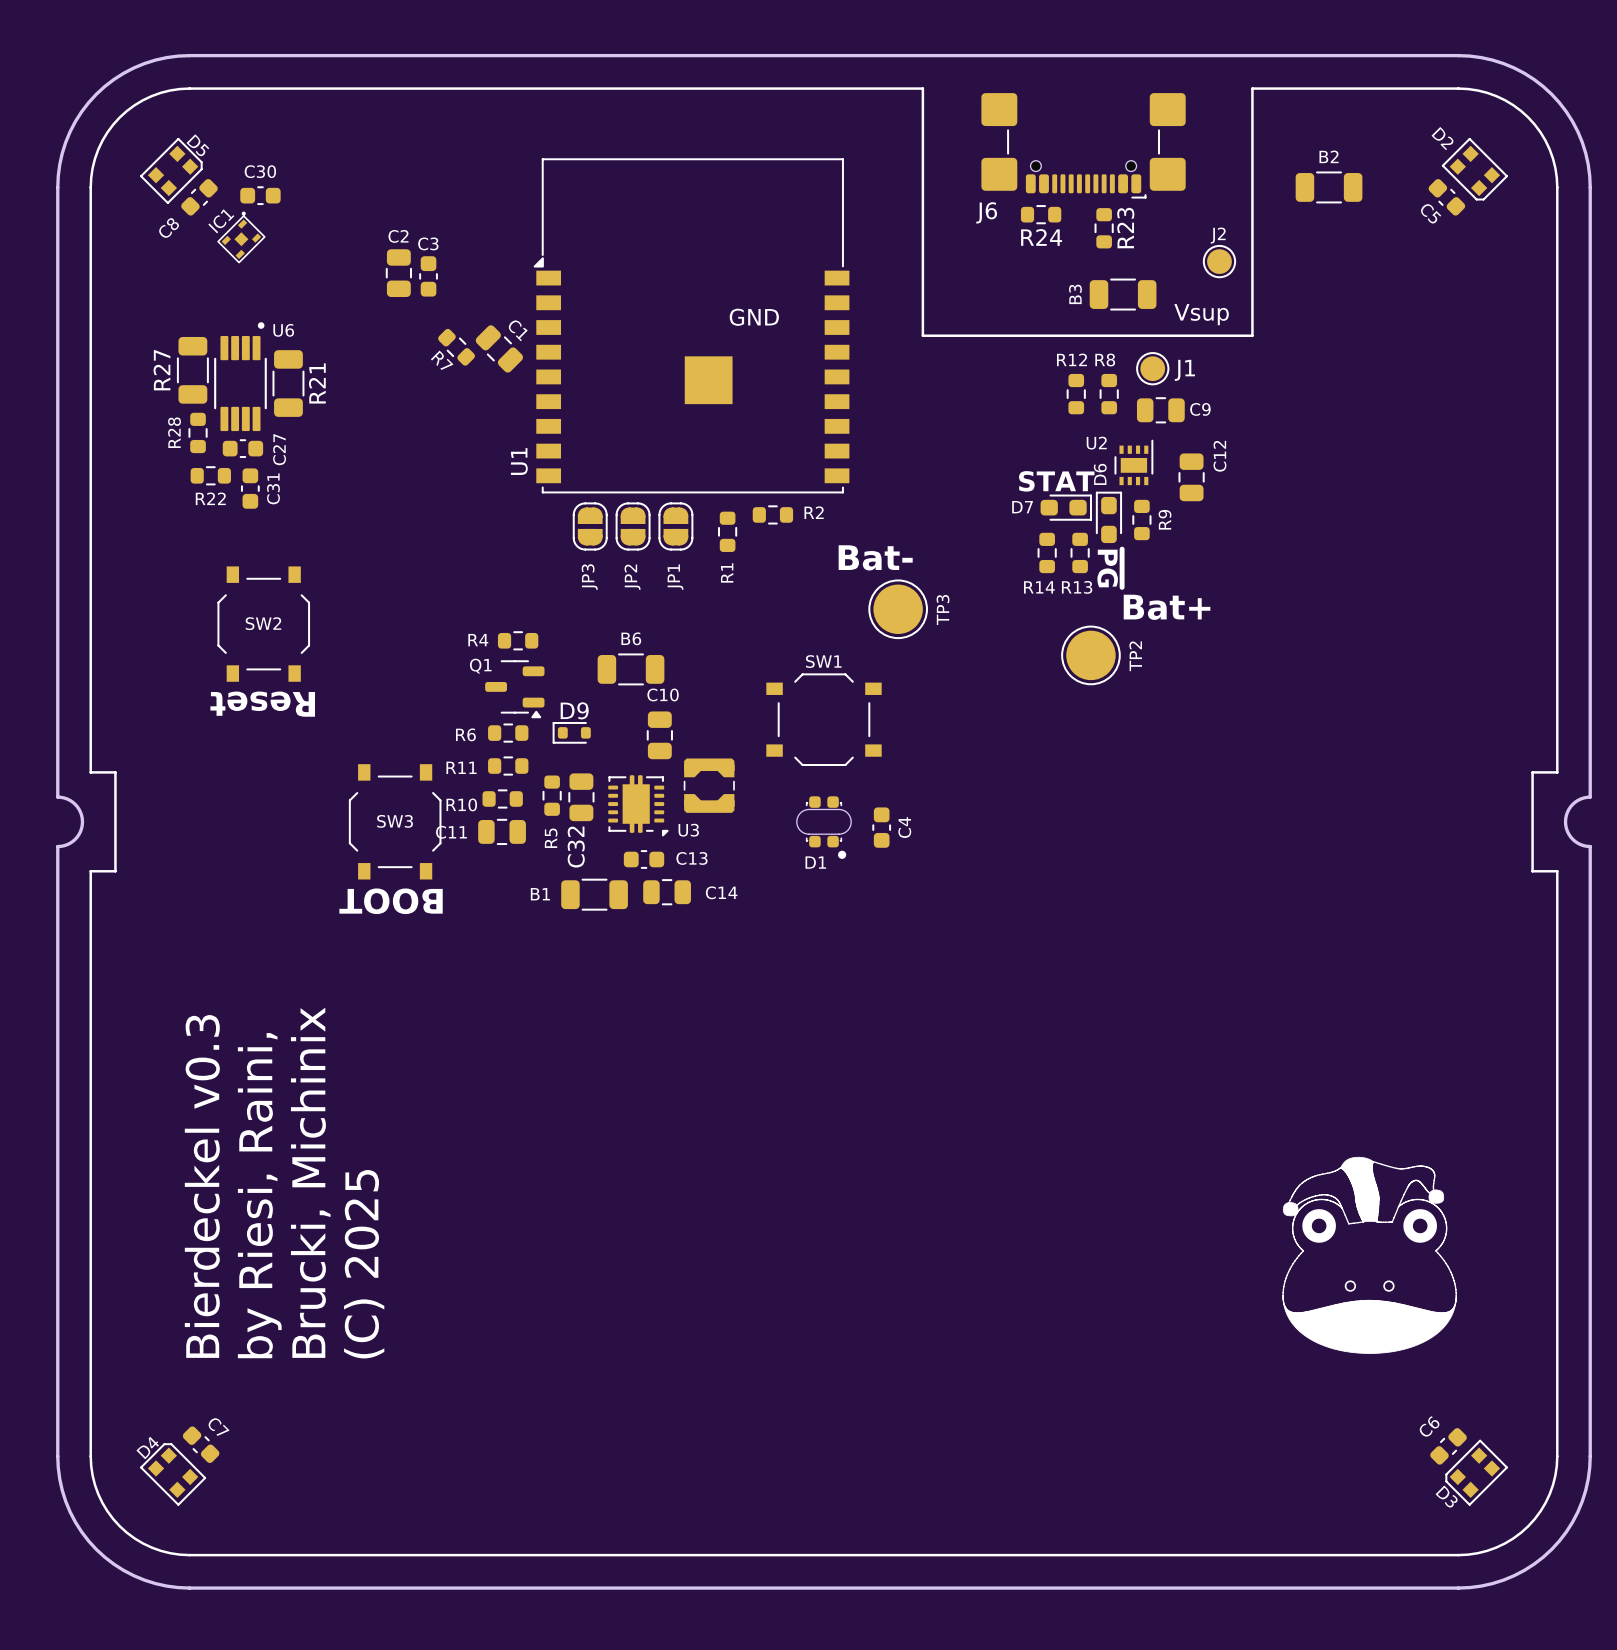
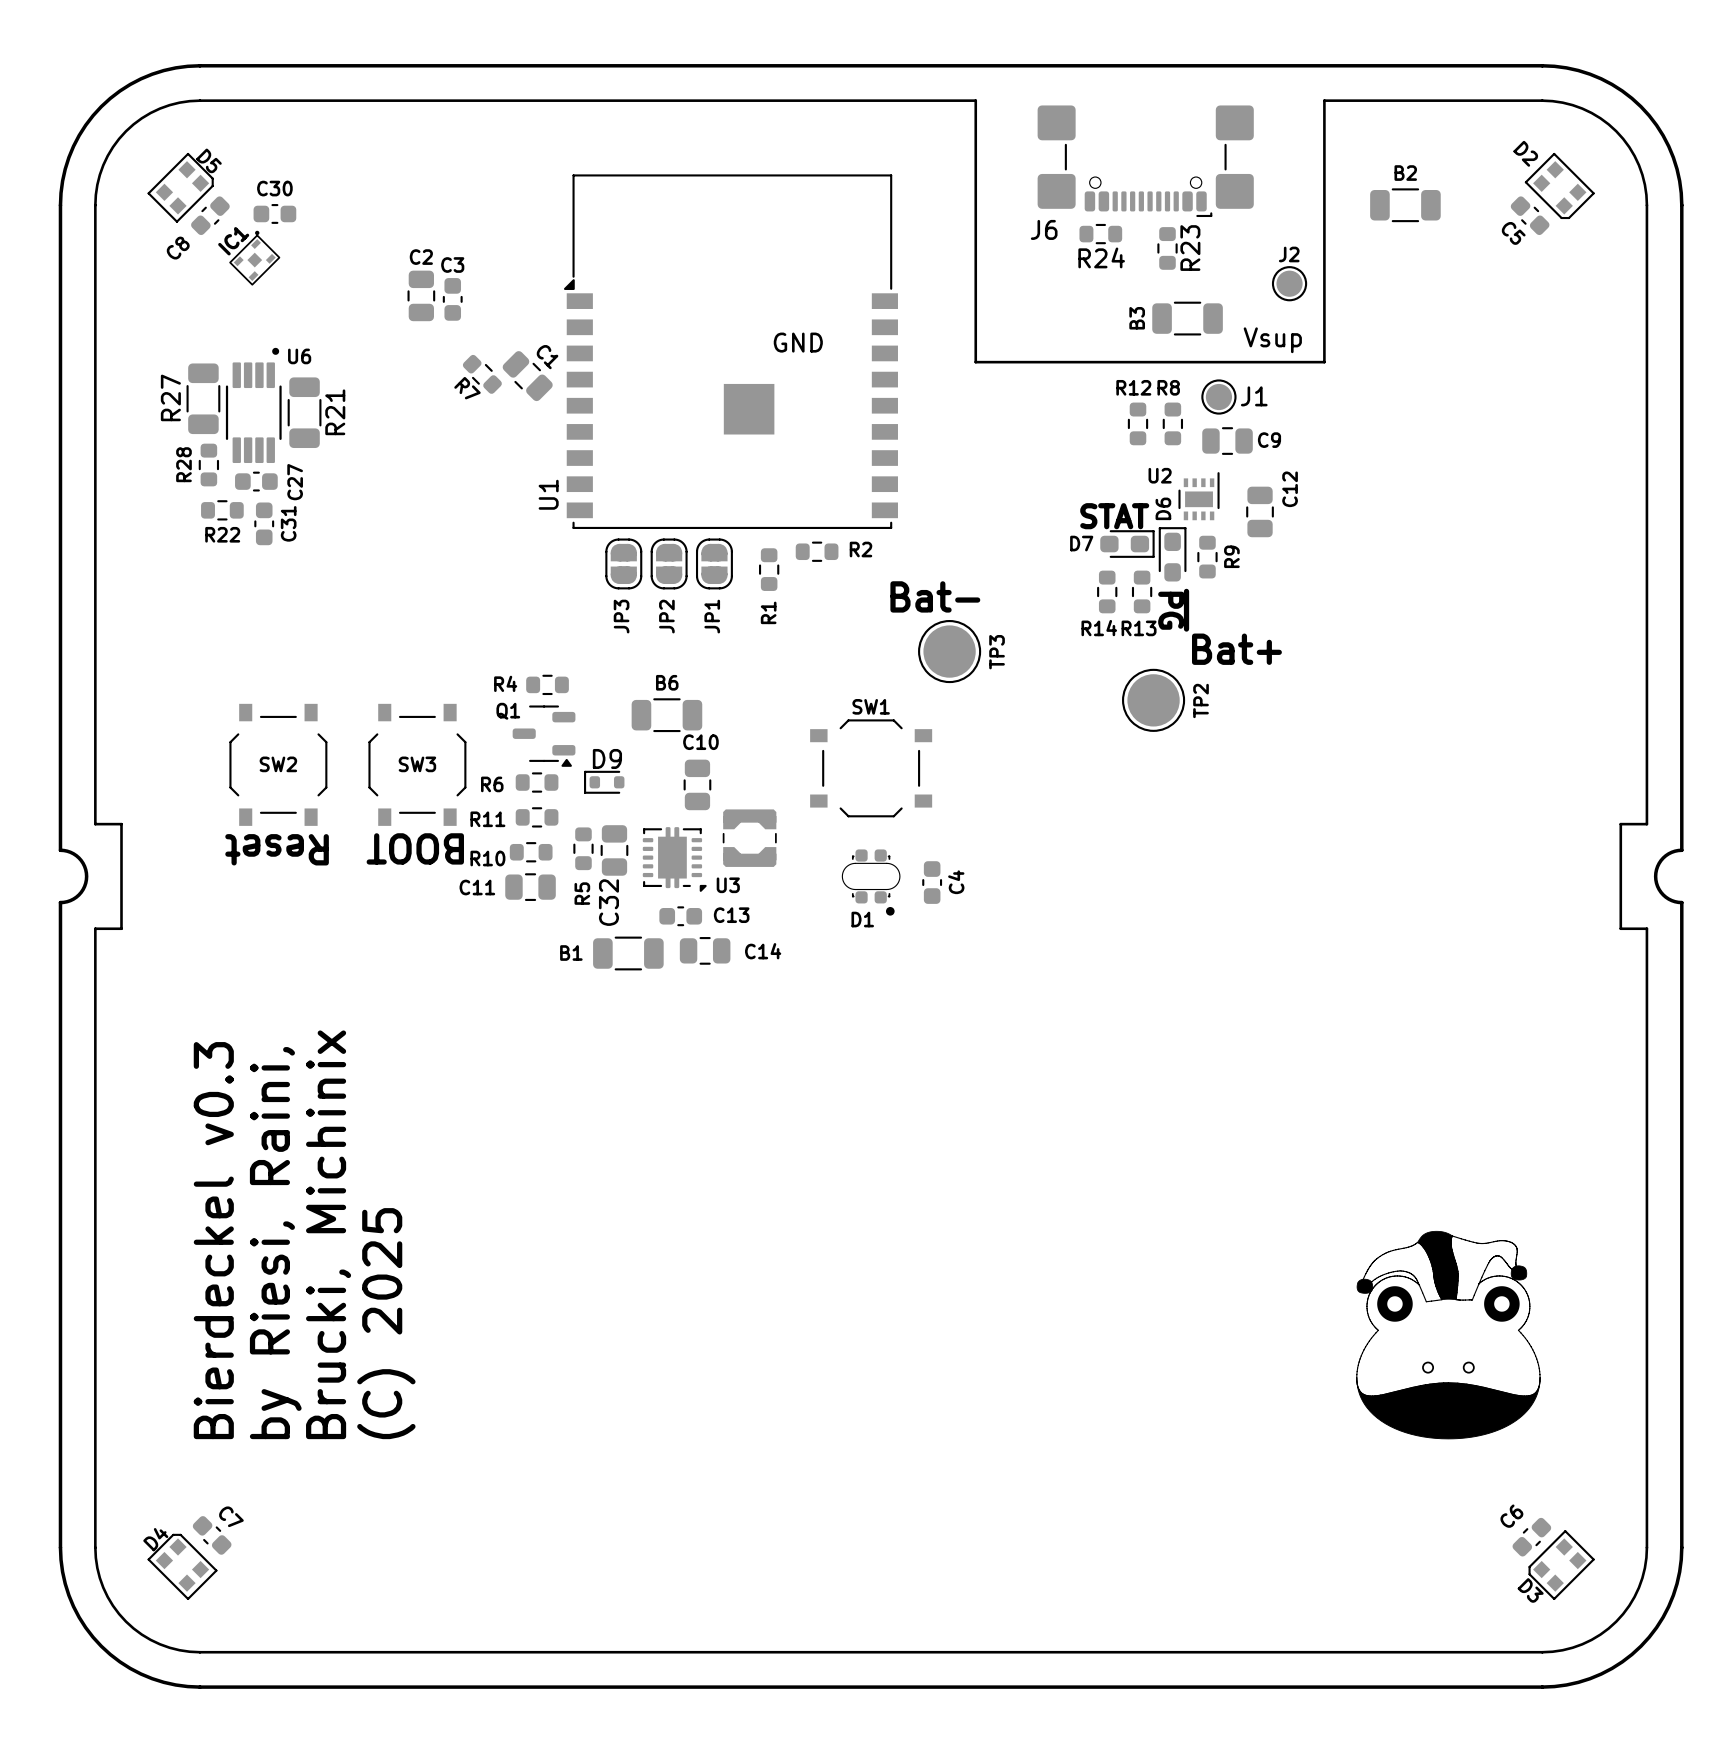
SW2 position: (263, 624) -> (278, 764)
text position: Reset (262, 704) -> Reset (277, 849)
SW3 position: (395, 821) -> (417, 764)
text position: BOOT (391, 901) -> BOOT (415, 848)

